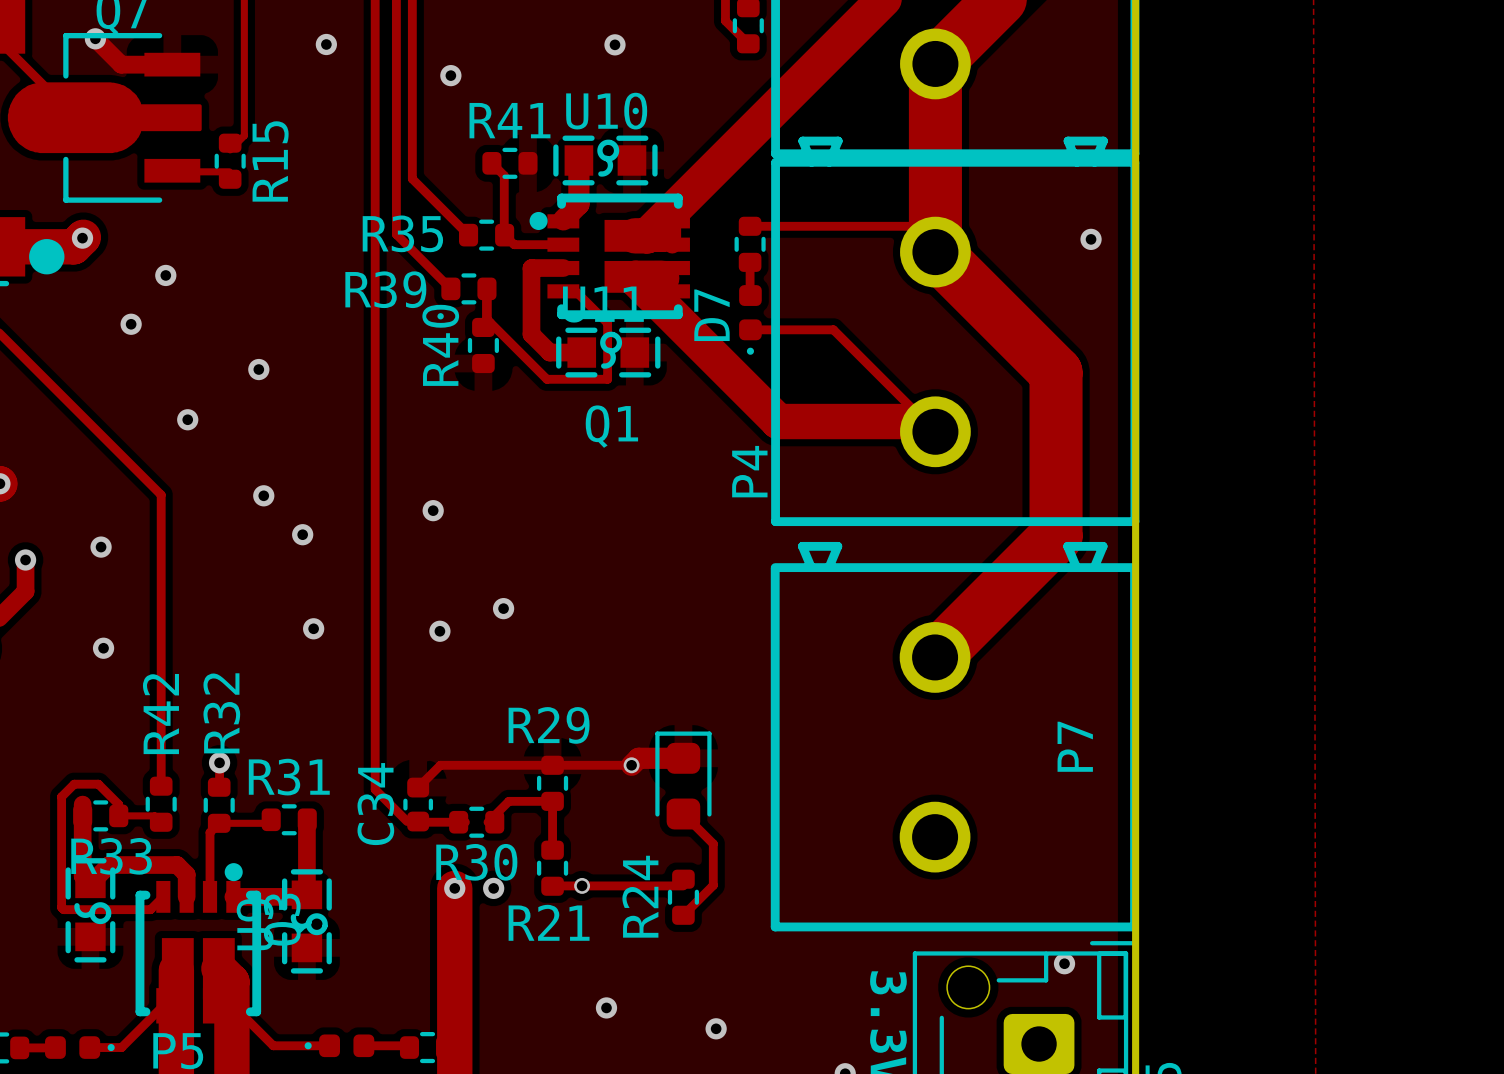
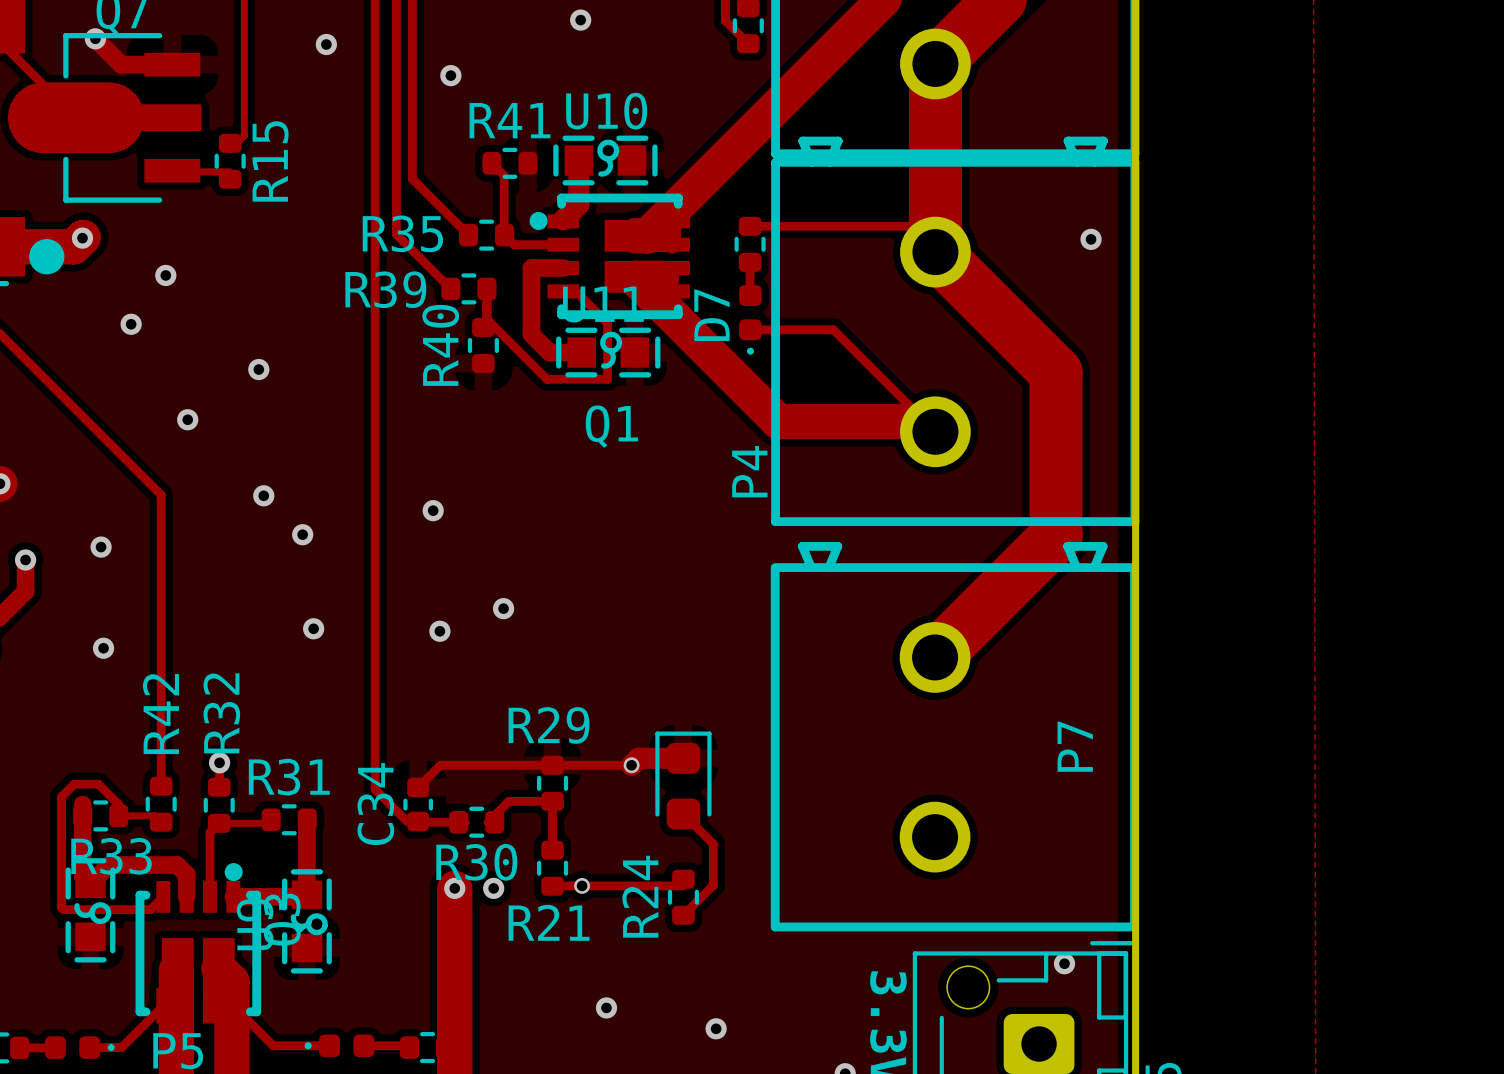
via position: (614, 44) -> (580, 20)

